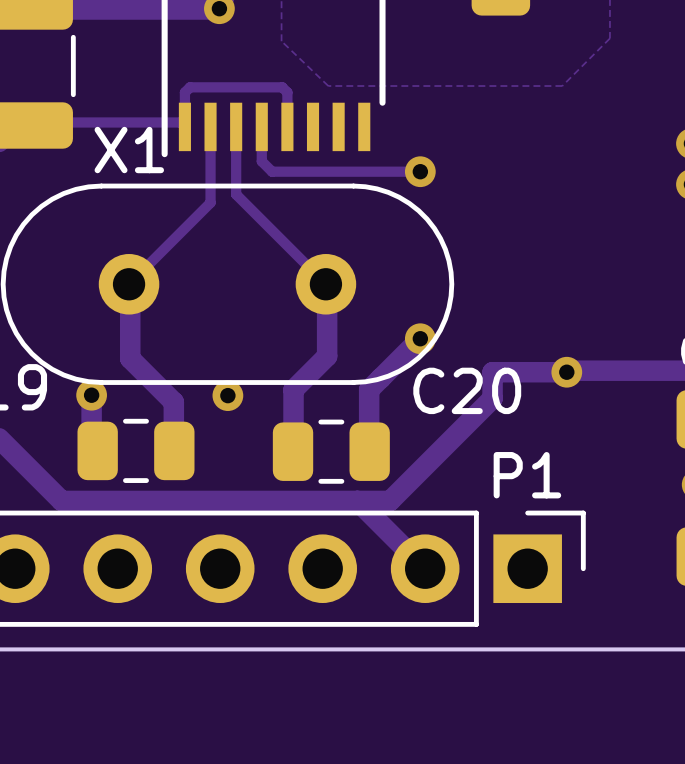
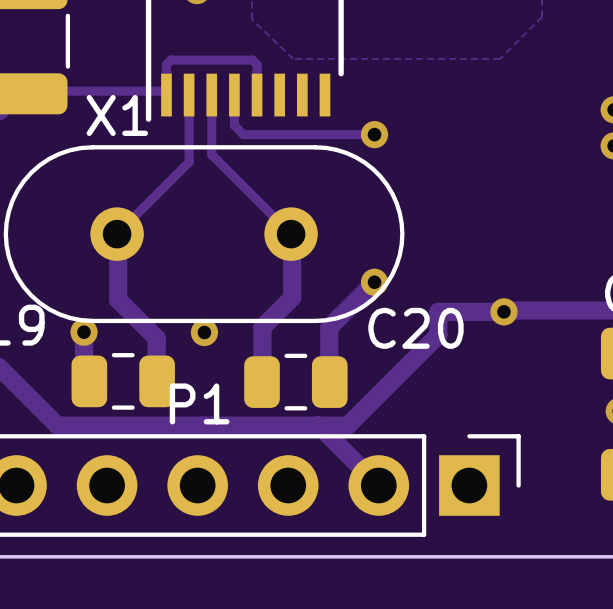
P1 name position: P1 (527, 475) -> P1 (199, 403)

